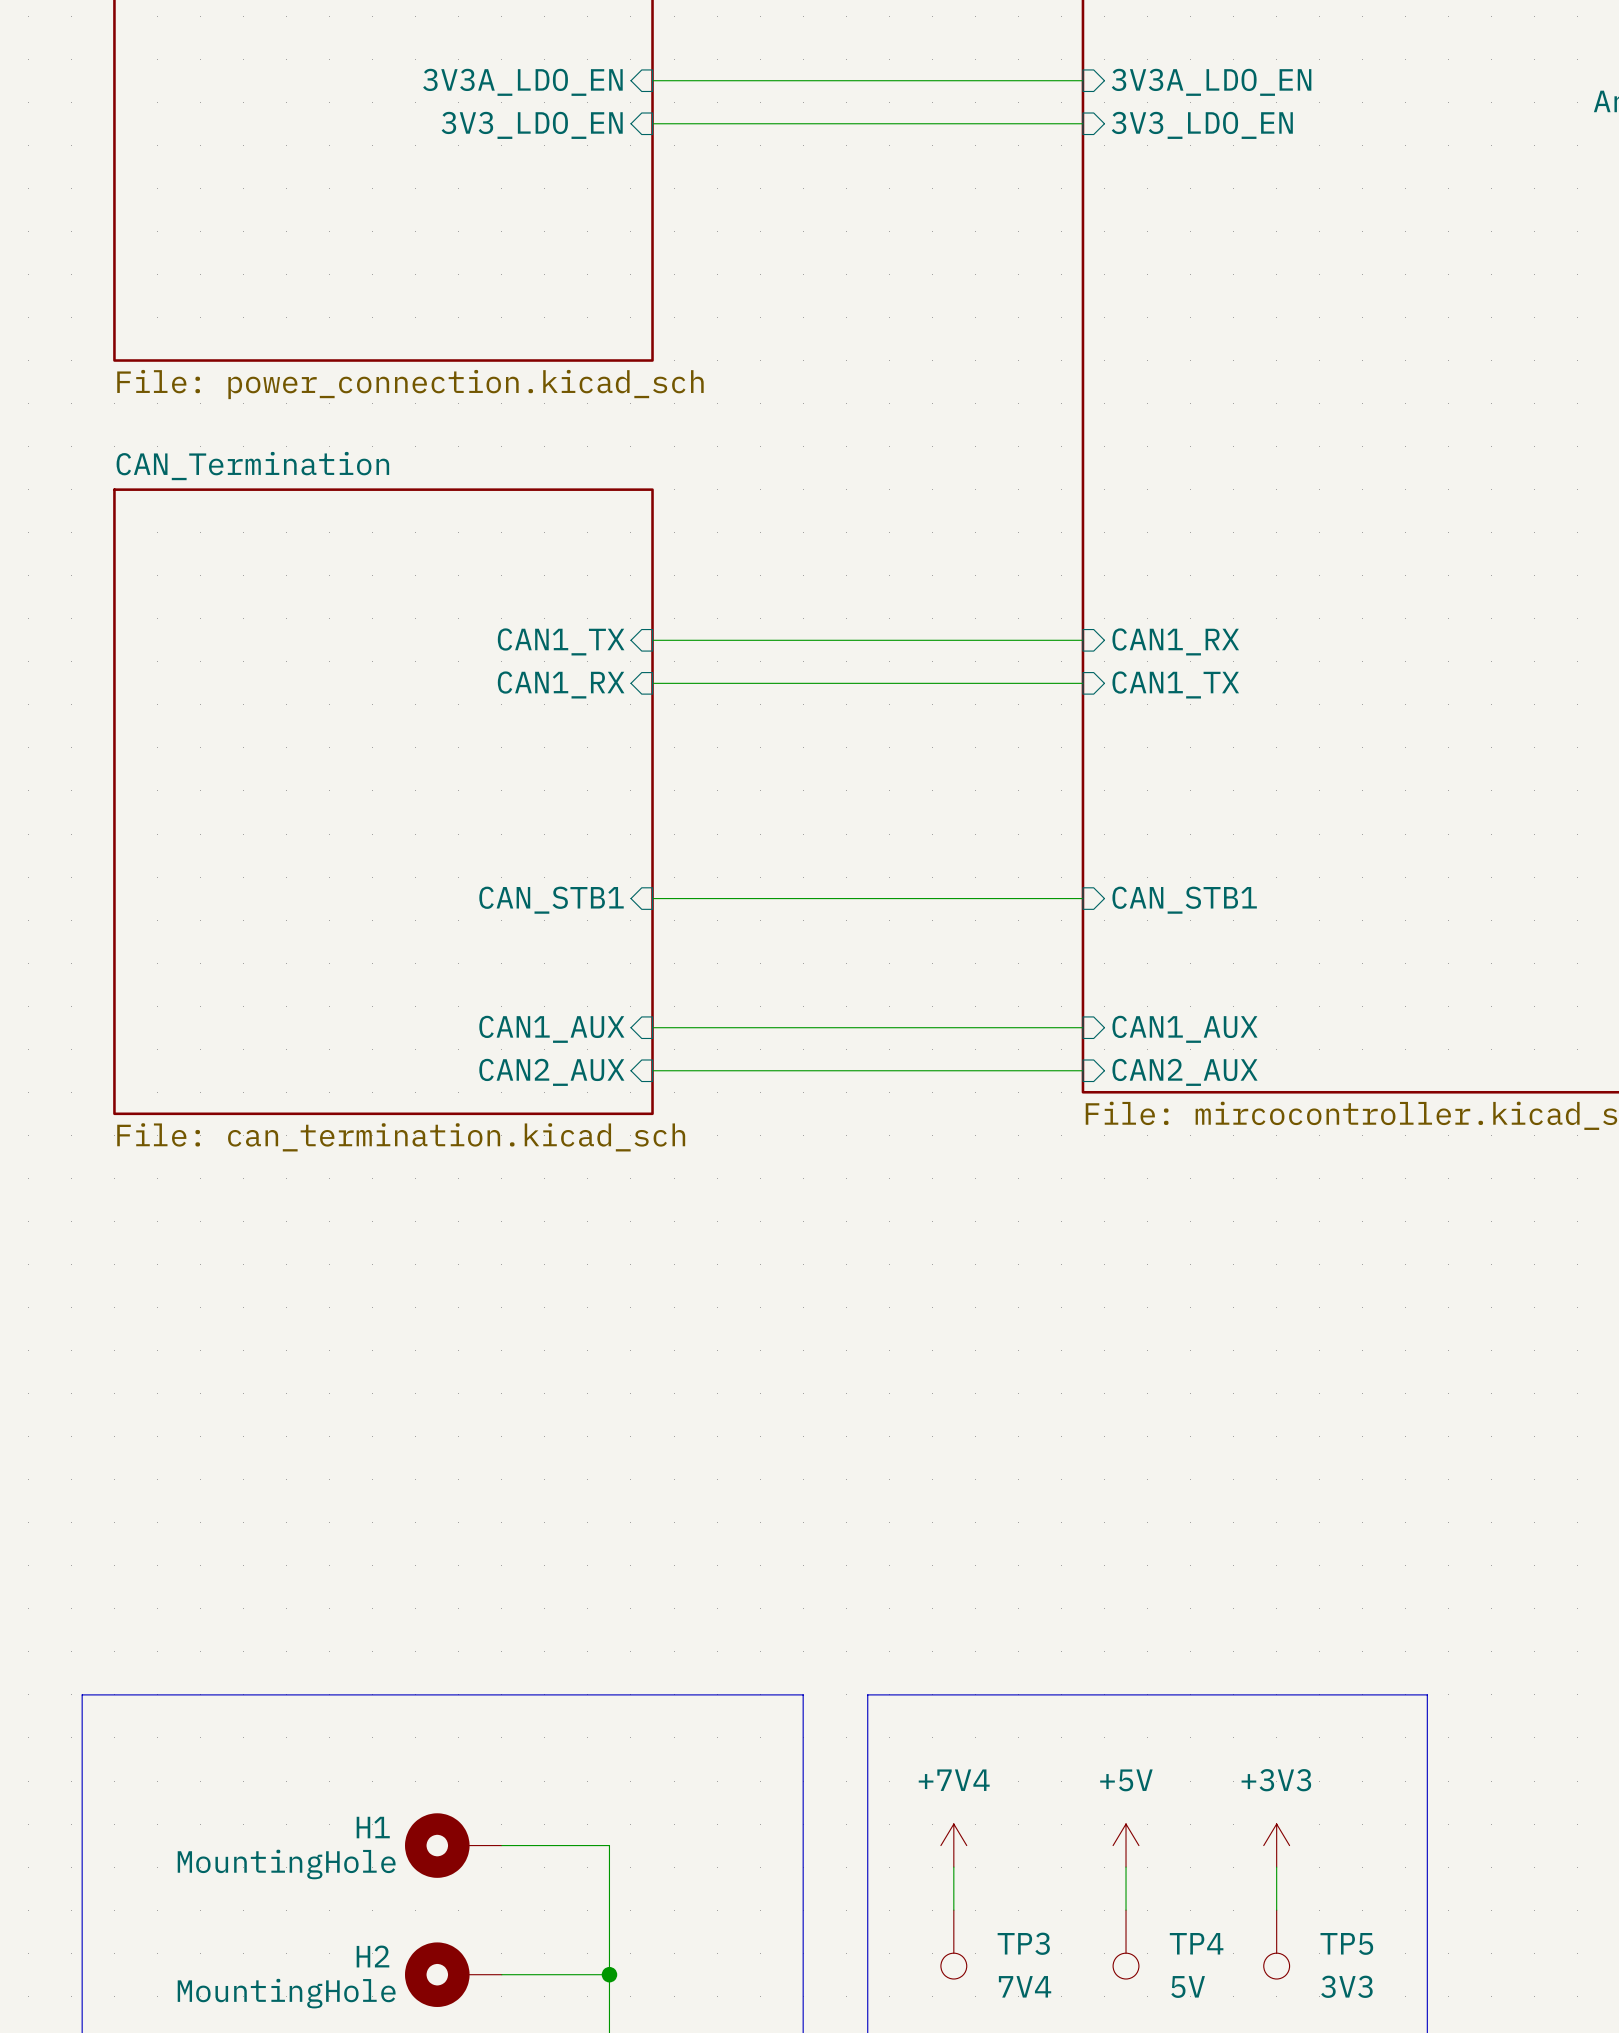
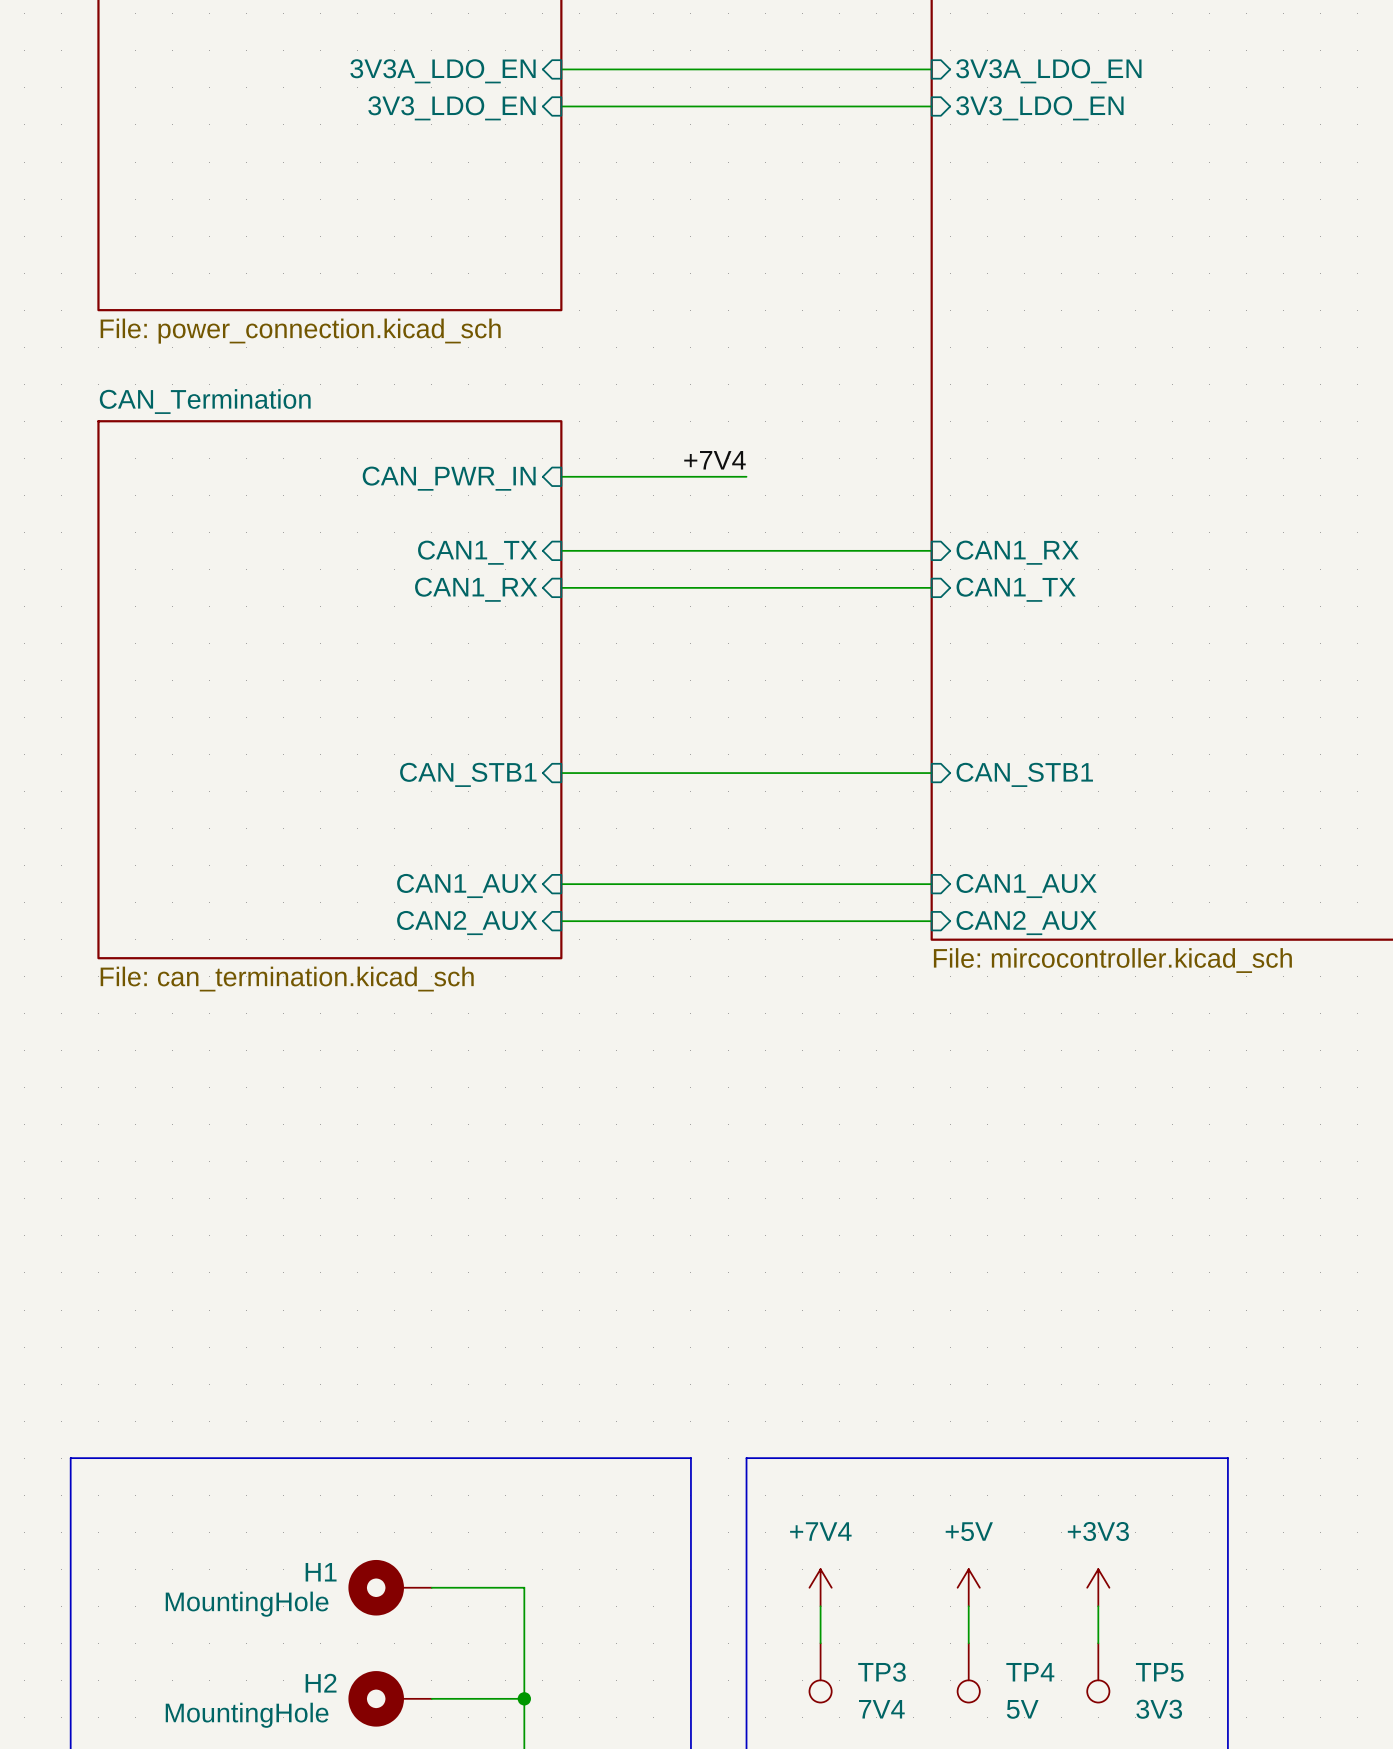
label: none -> +7V4 (714, 460)
wire: none -> (561, 476) (746, 476)
sheet pin: none -> CAN_PWR_IN (449, 478)

